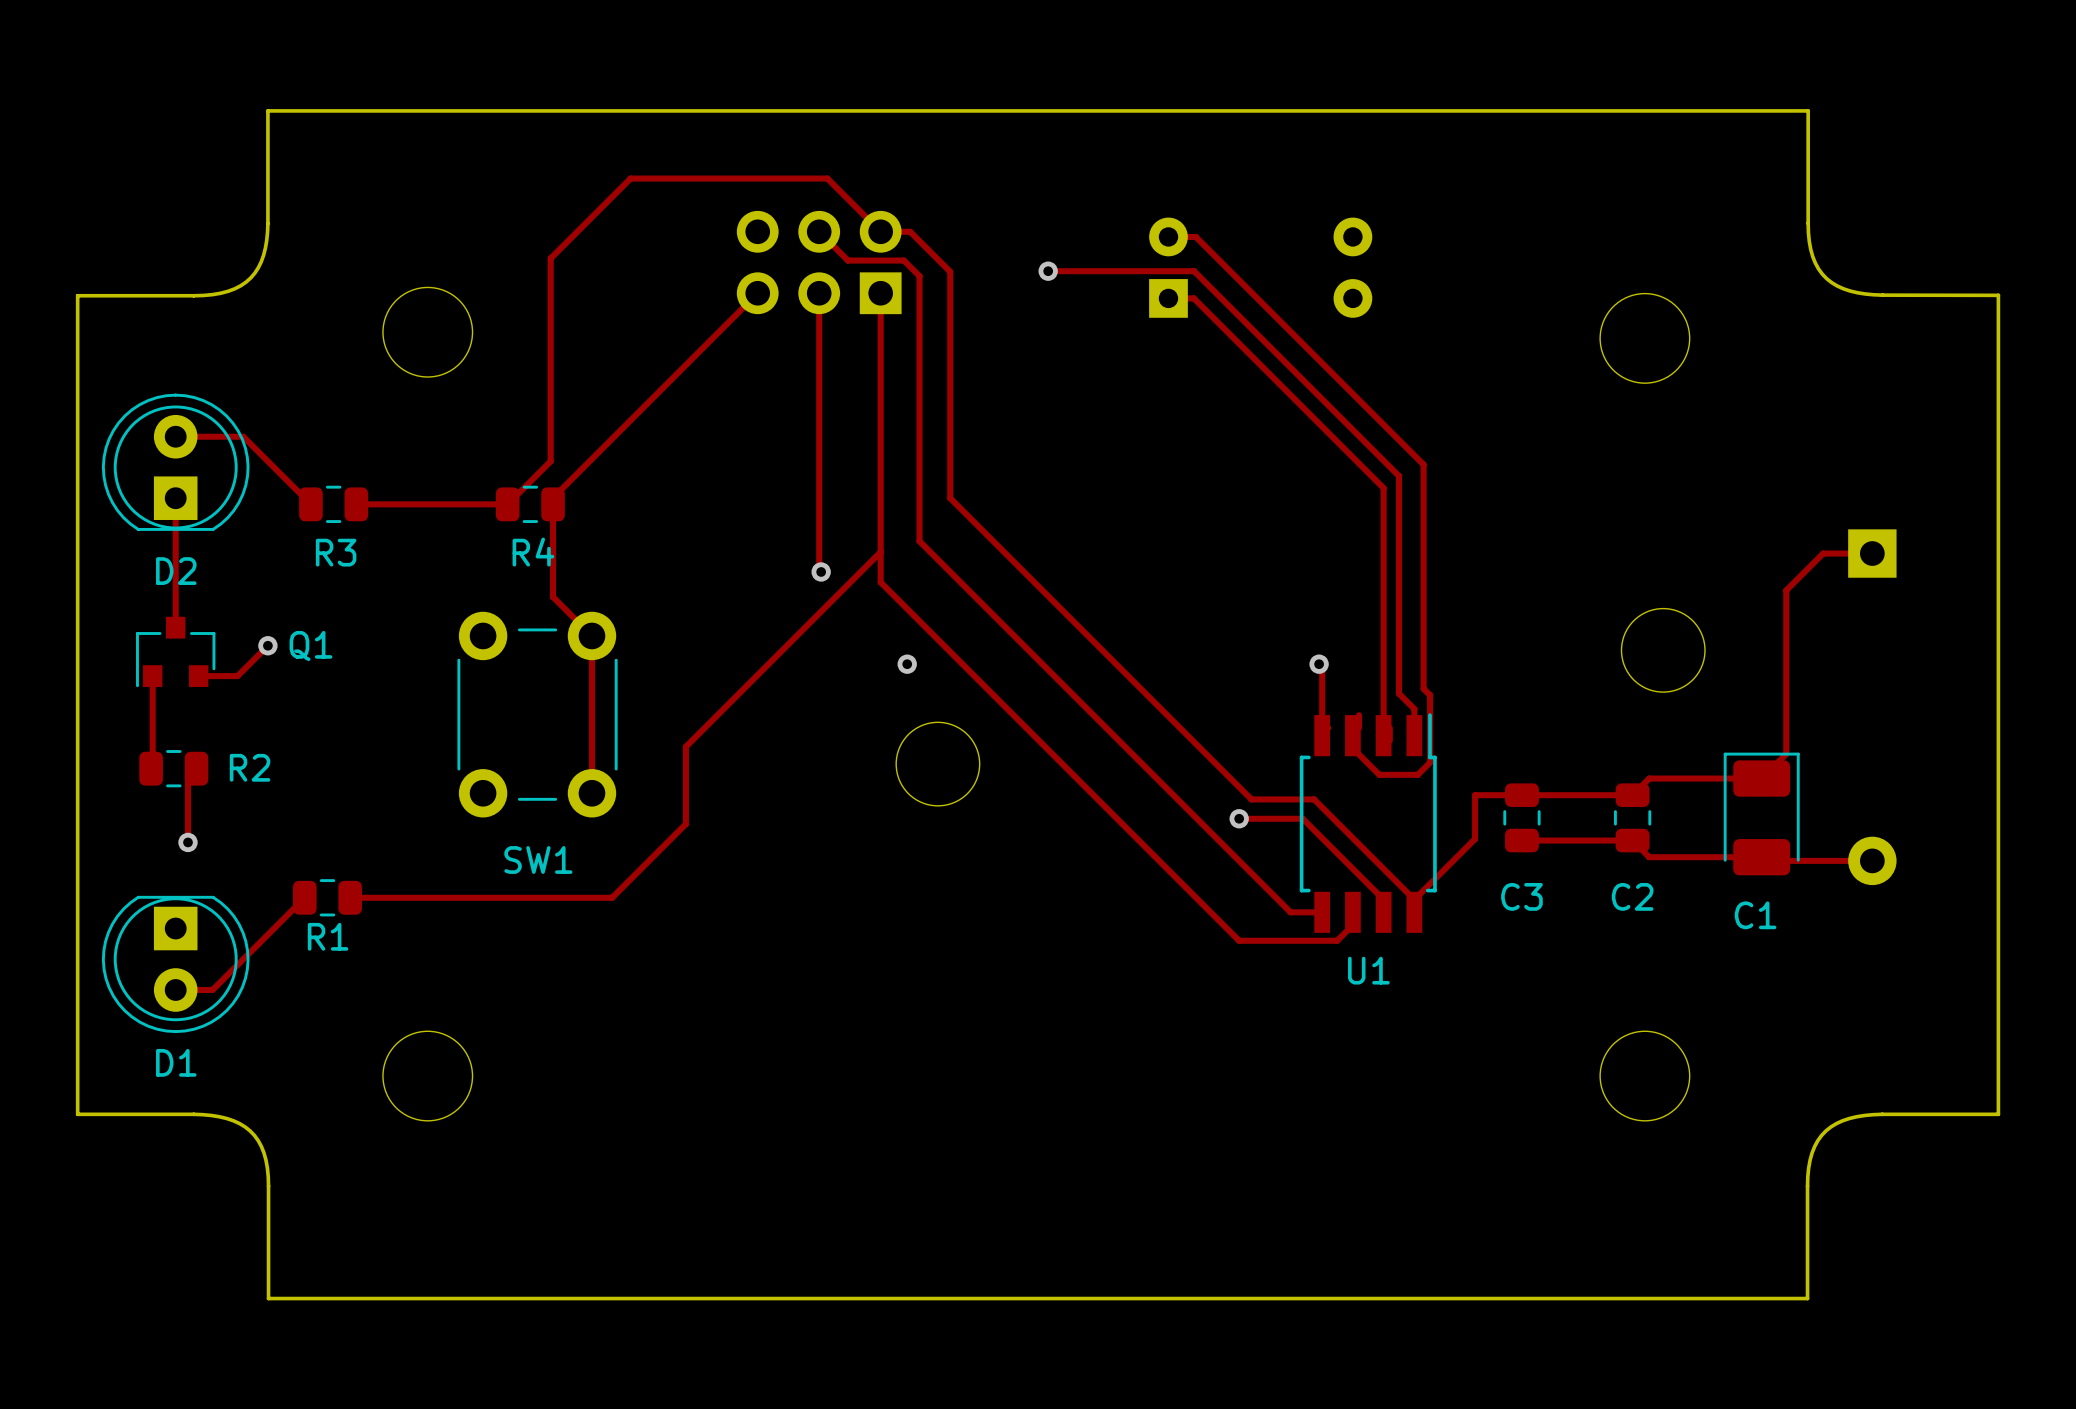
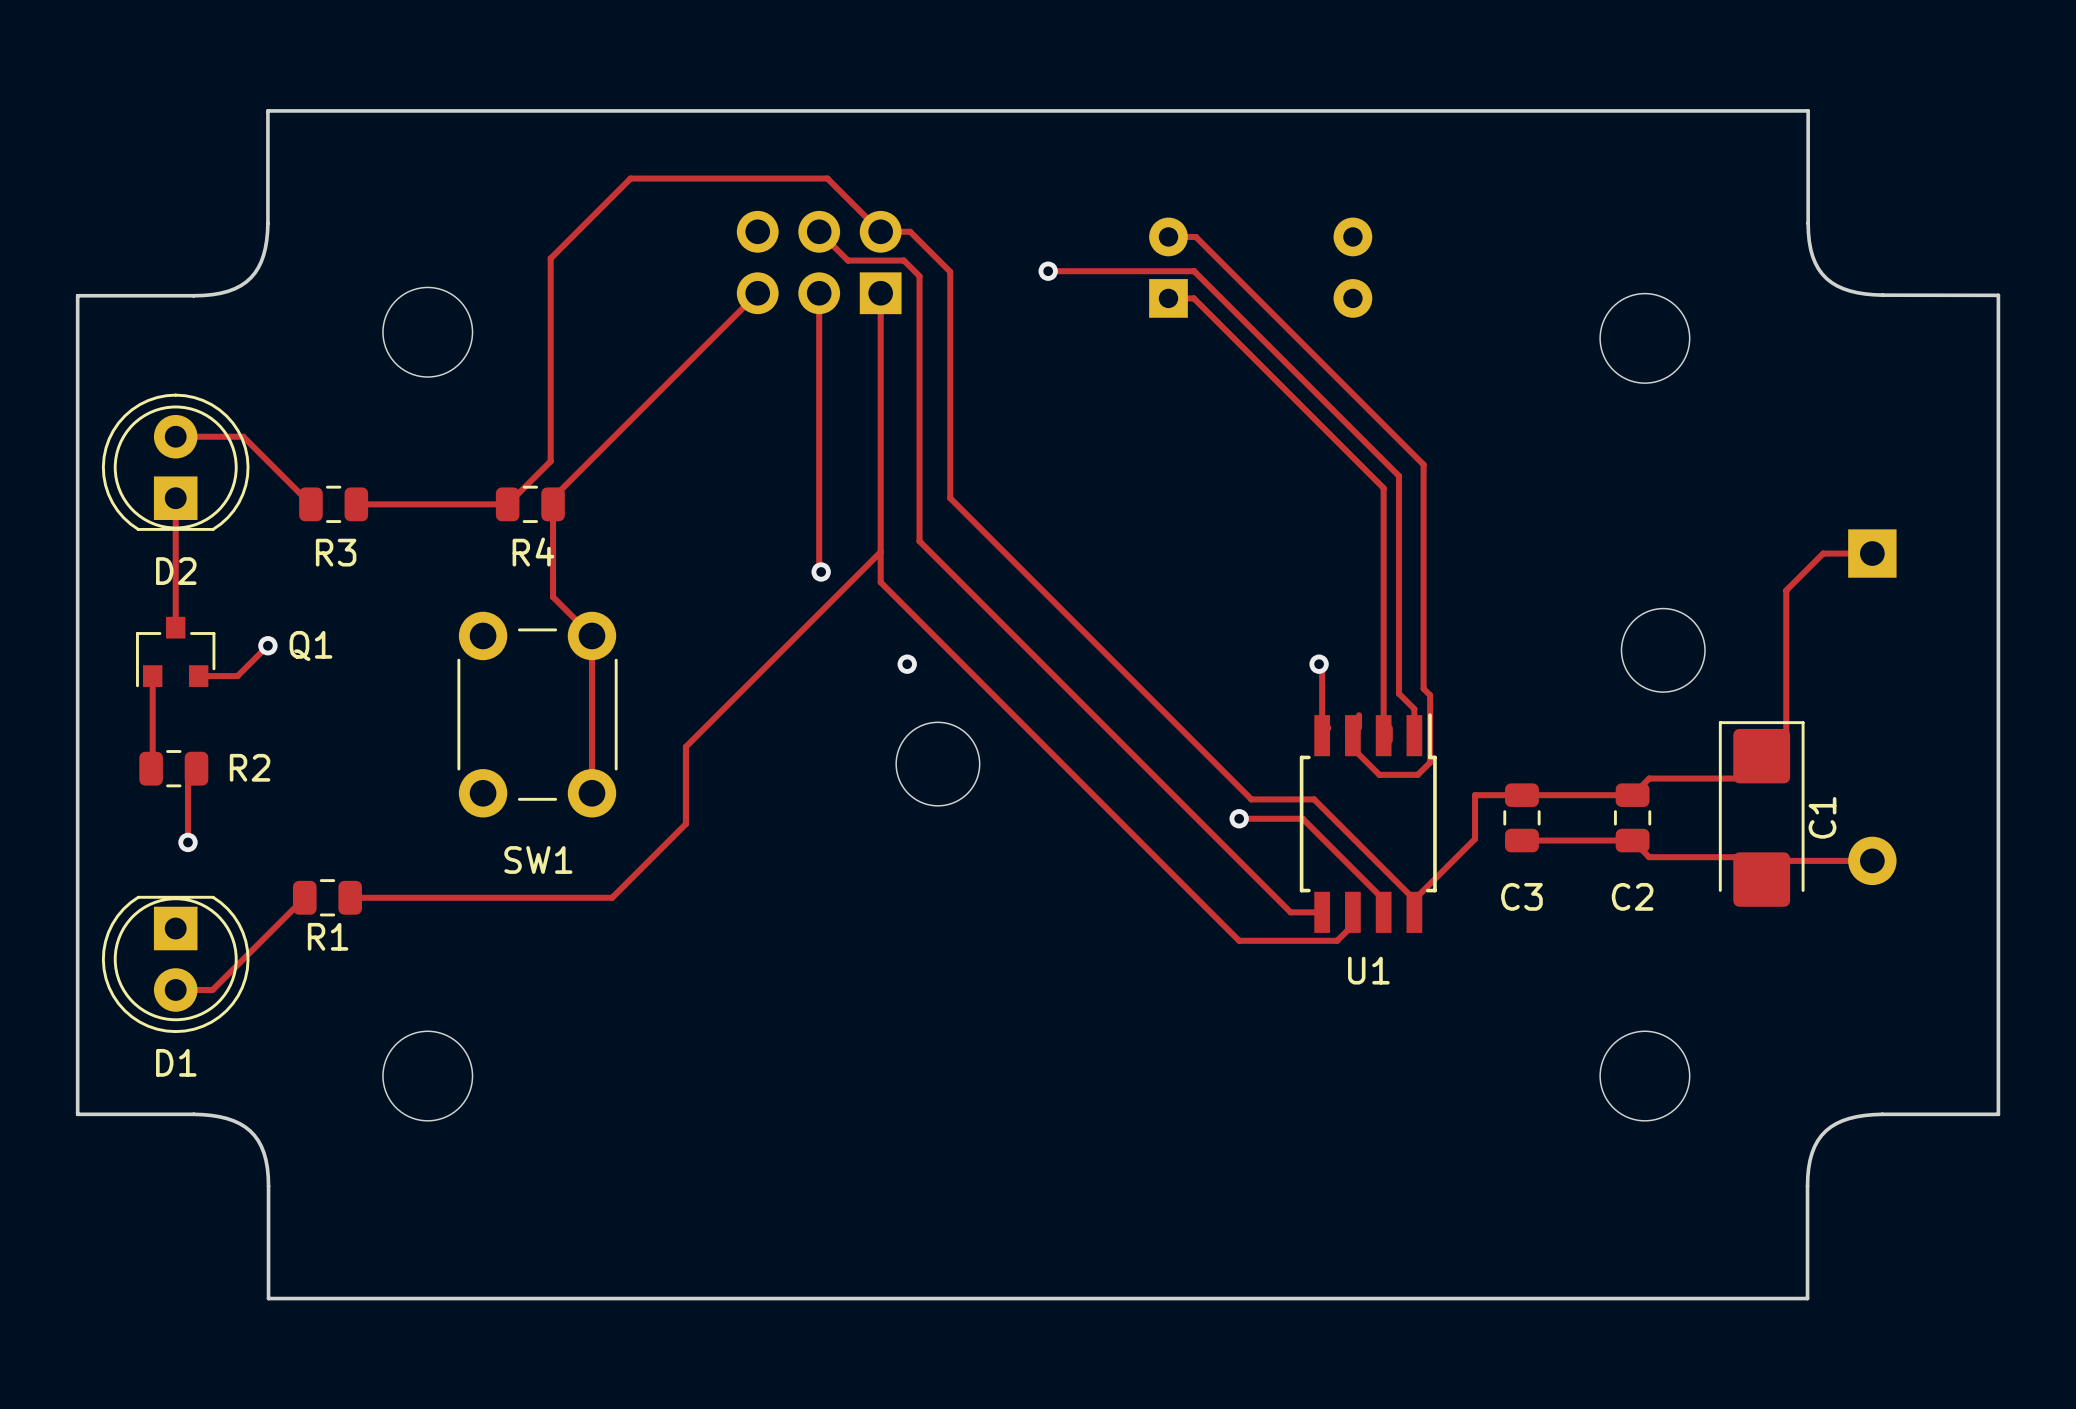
C1 footprint: [1723, 752, 1800, 876] -> [1718, 721, 1805, 907]
C1 name position: C1 (1755, 915) -> C1 (1822, 817)

